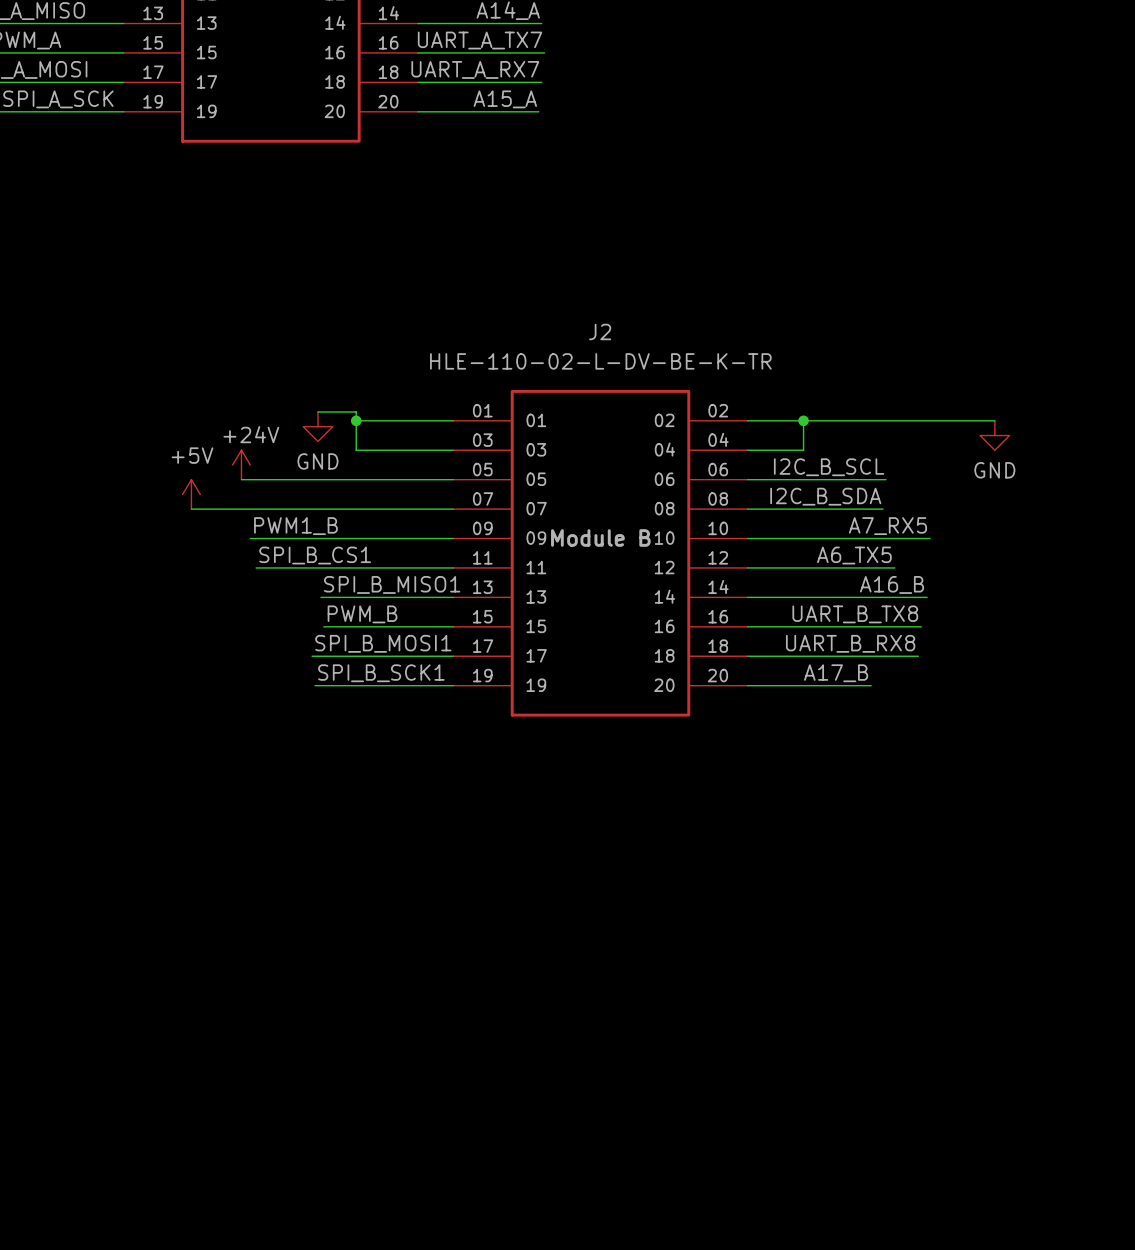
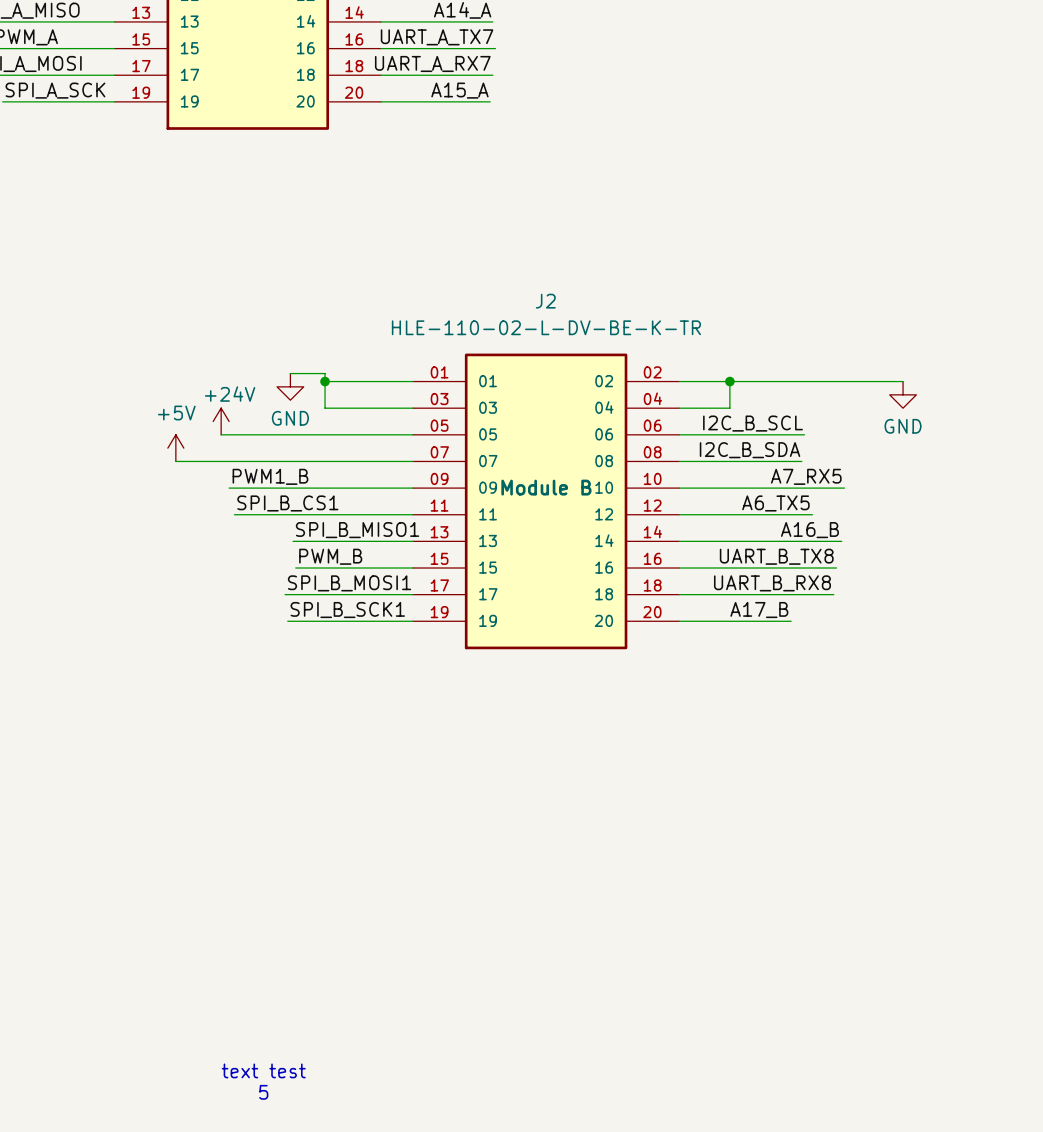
text: none -> text test (263, 1070)
text: none -> 5 (263, 1092)

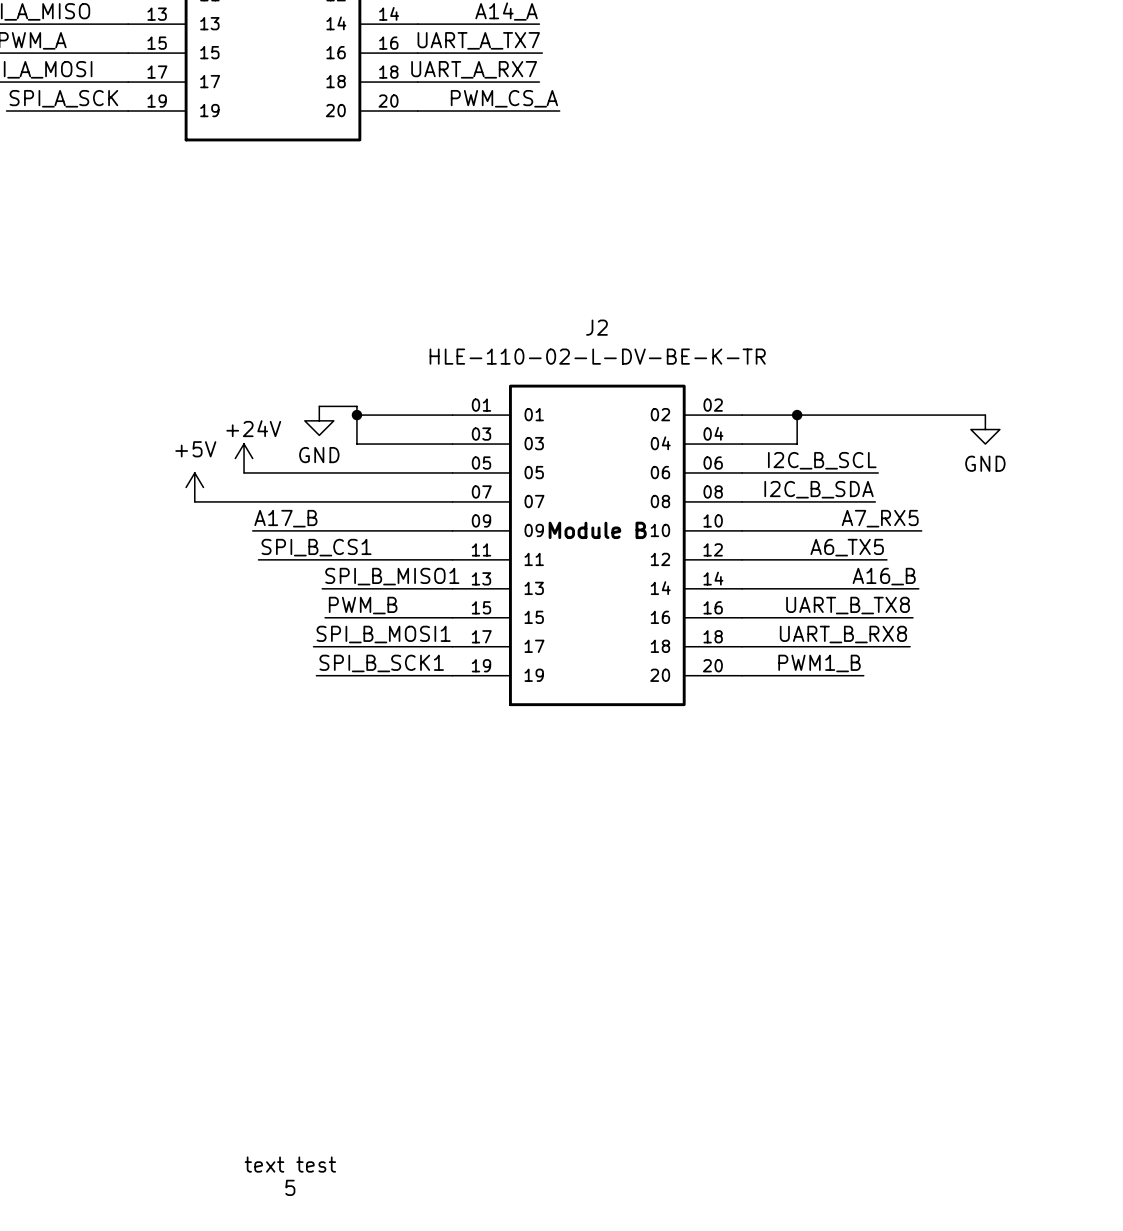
label: A15_A (459, 90) -> none
label: none -> PWM_CS_A (504, 98)
wire: none -> (536, 111) (559, 111)
label: PWM1_B (270, 476) -> A17_B (285, 518)
label: A17_B (759, 610) -> PWM1_B (819, 663)

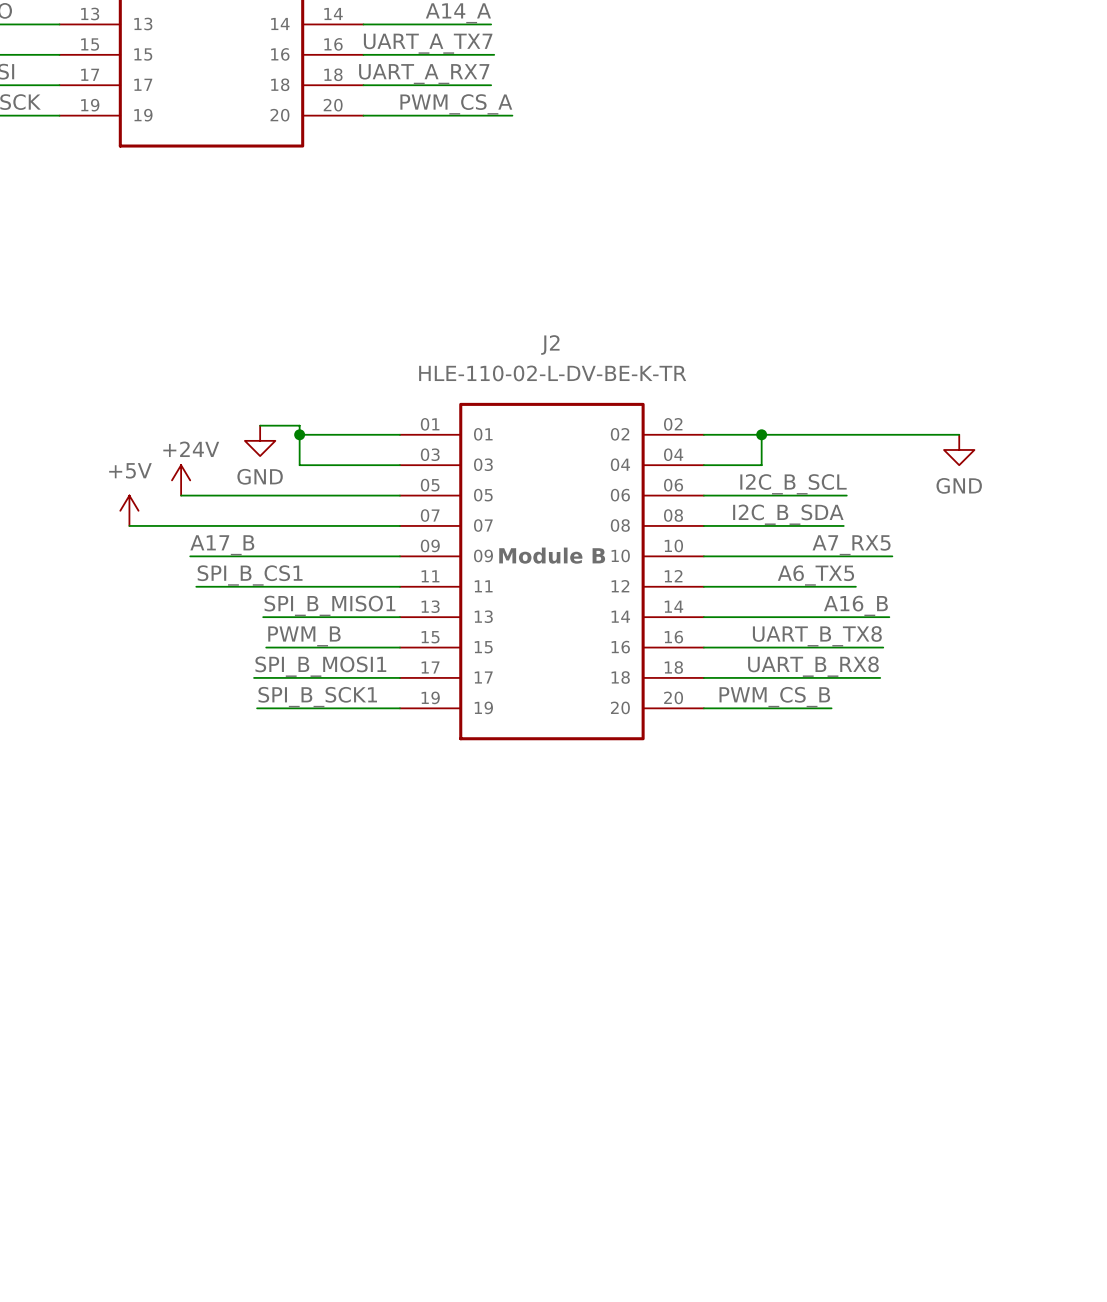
label: PWM1_B (819, 663) -> PWM_CS_B (774, 697)
text: text test (290, 1164) -> none
text: 5 (290, 1187) -> none

